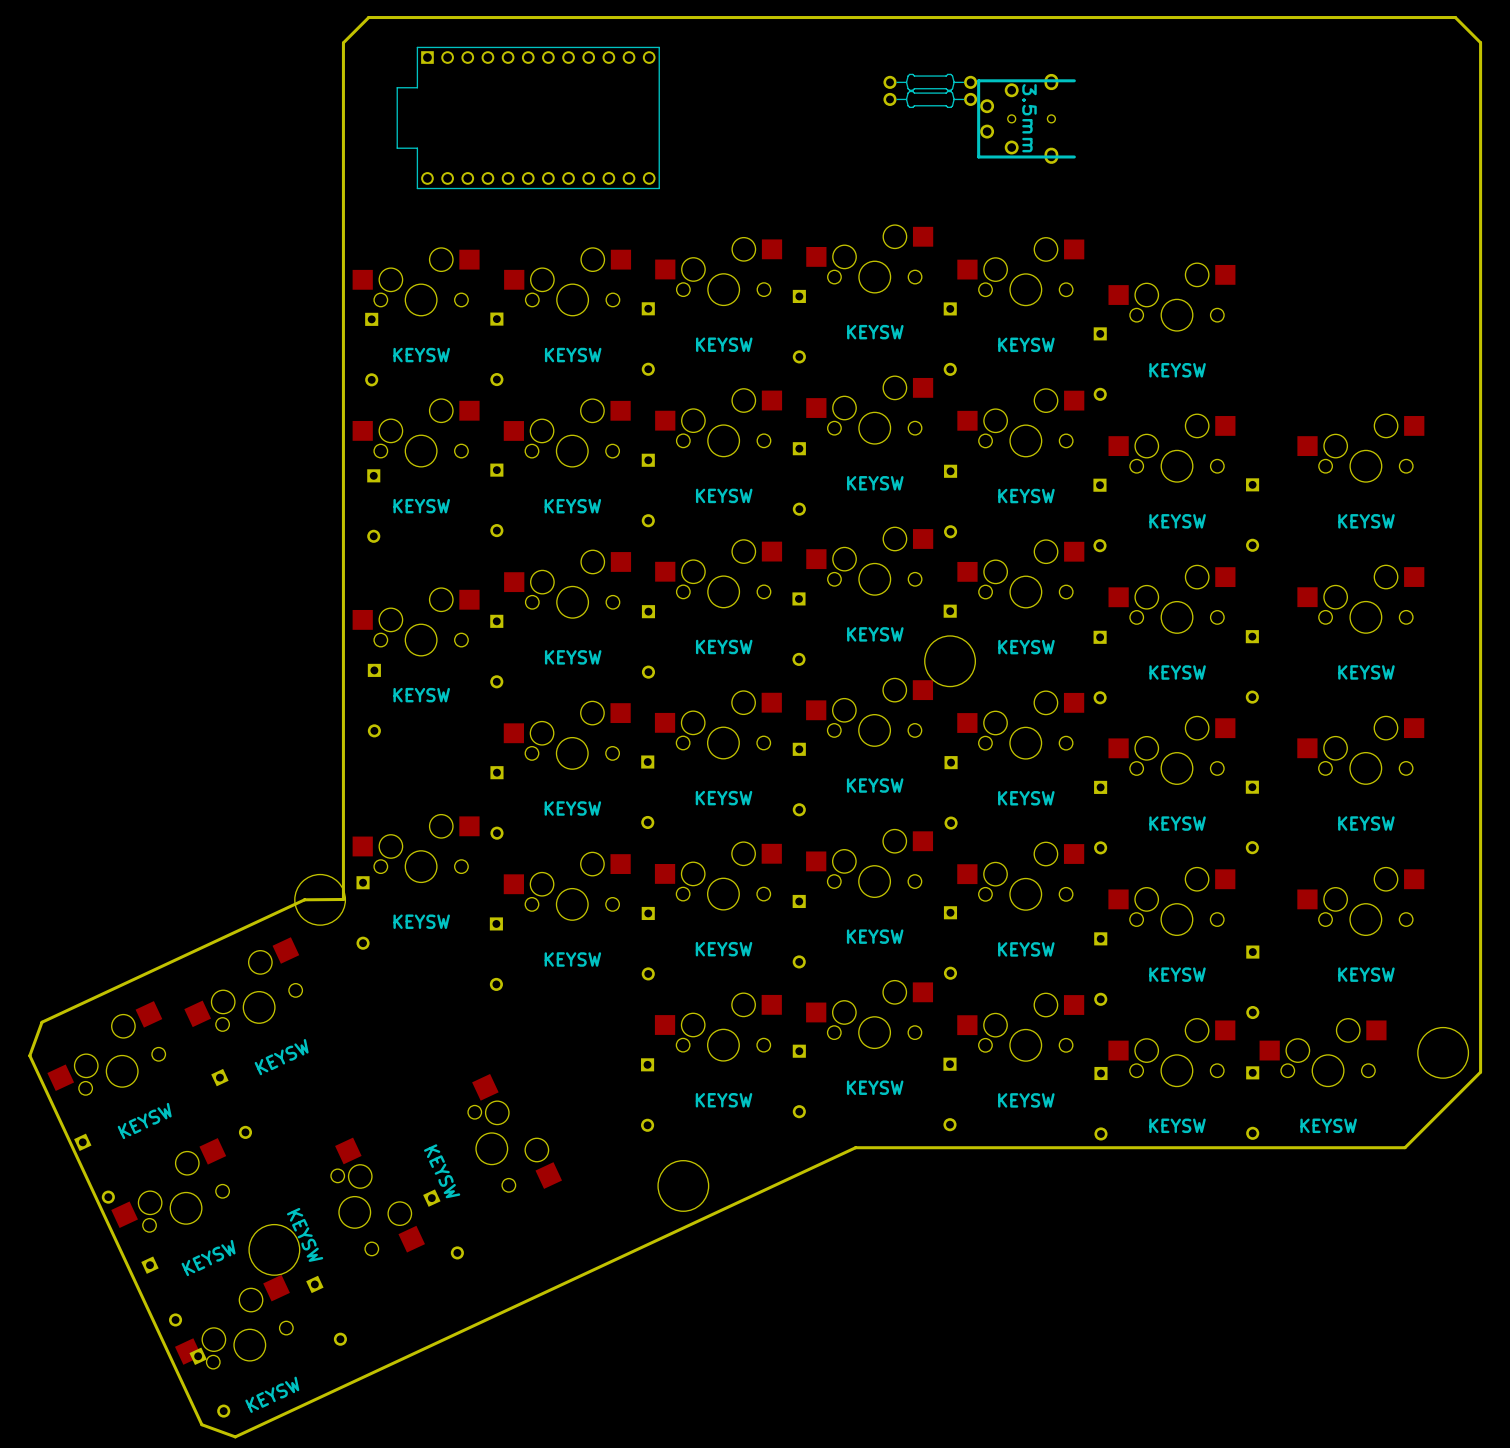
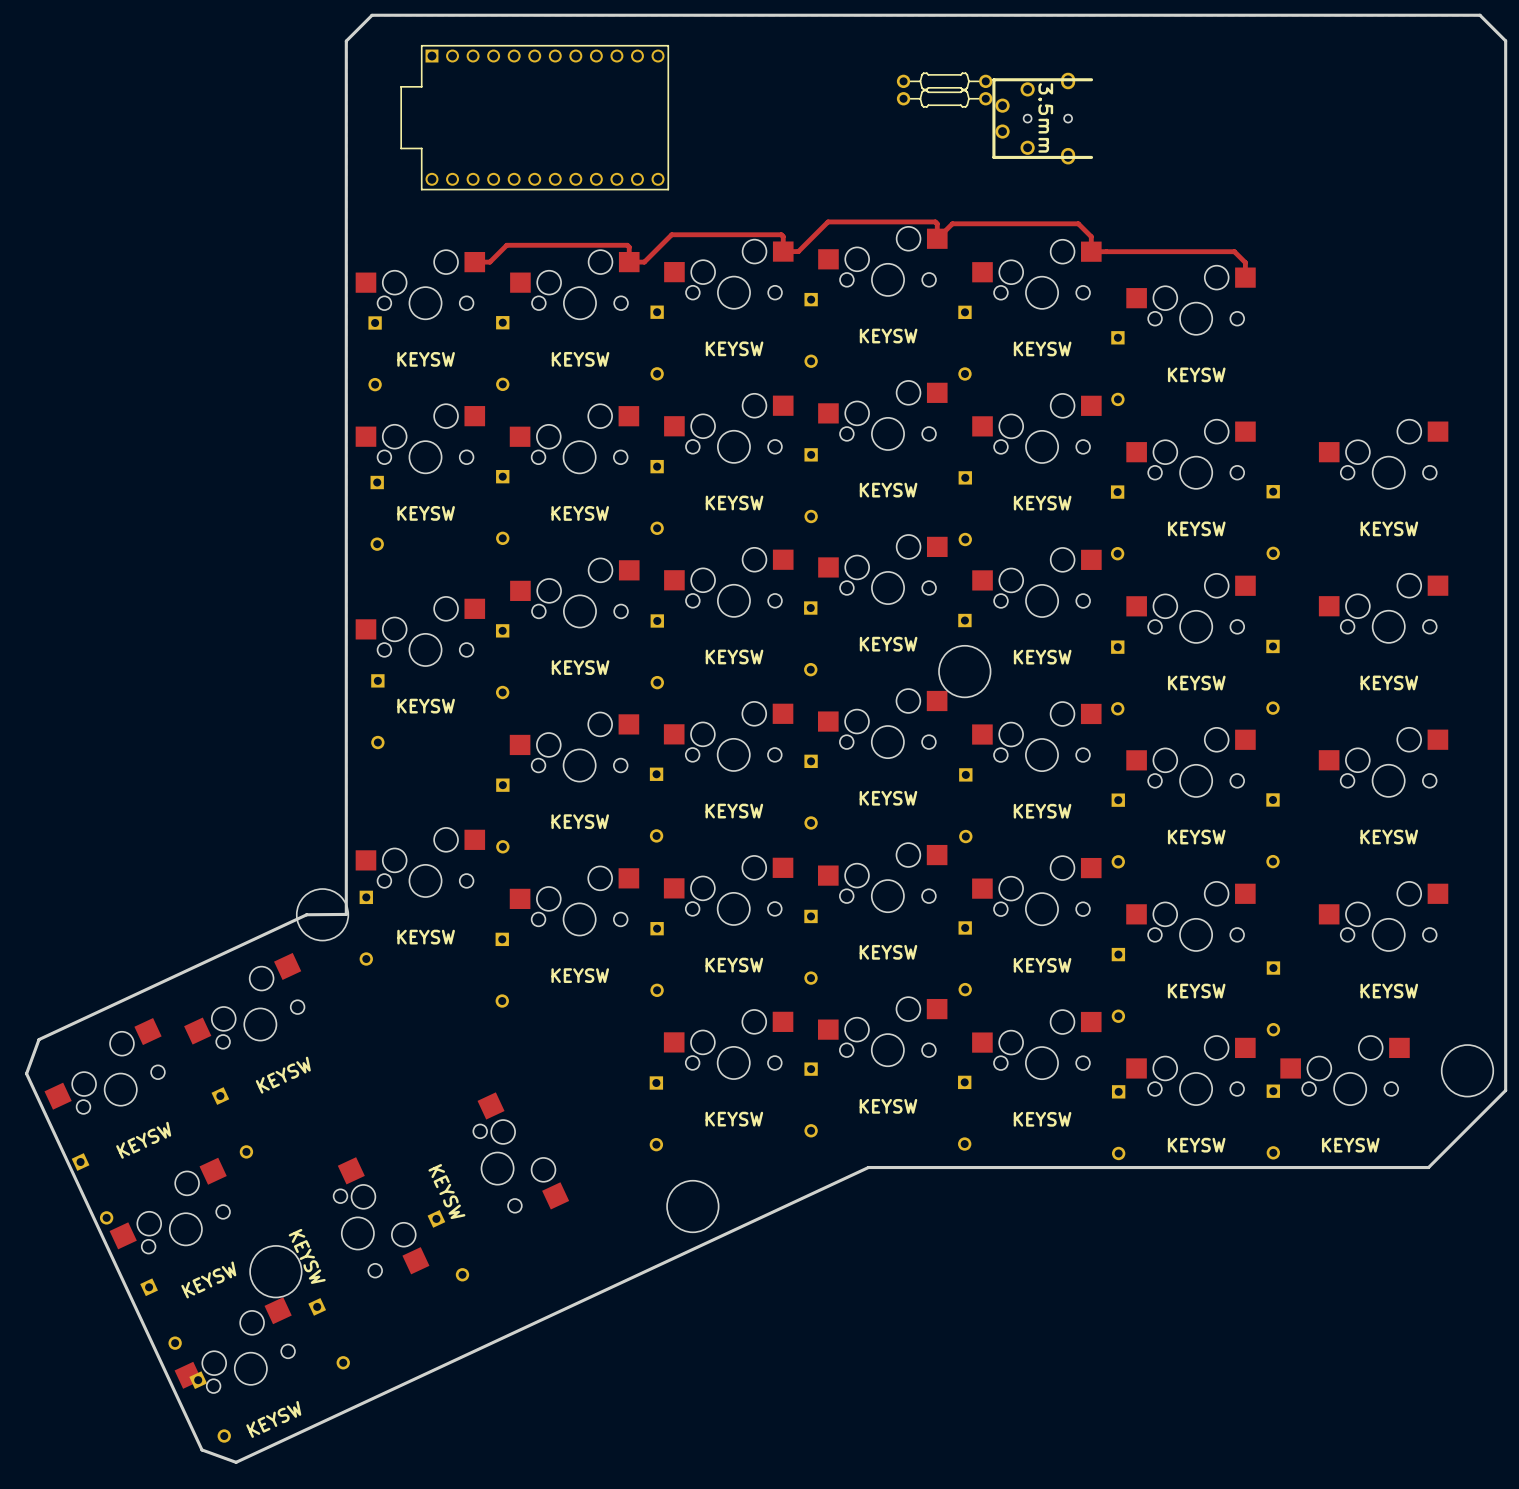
top track: none -> (474, 262) (489, 262) (506, 245) (627, 245) (629, 247) (629, 262) (644, 262) (671, 234) (781, 234) (783, 236) (783, 251) (798, 251) (828, 221) (935, 221) (937, 223) (937, 238) (952, 223) (1078, 223) (1091, 236) (1091, 251) (1234, 251) (1245, 262) (1245, 277)

